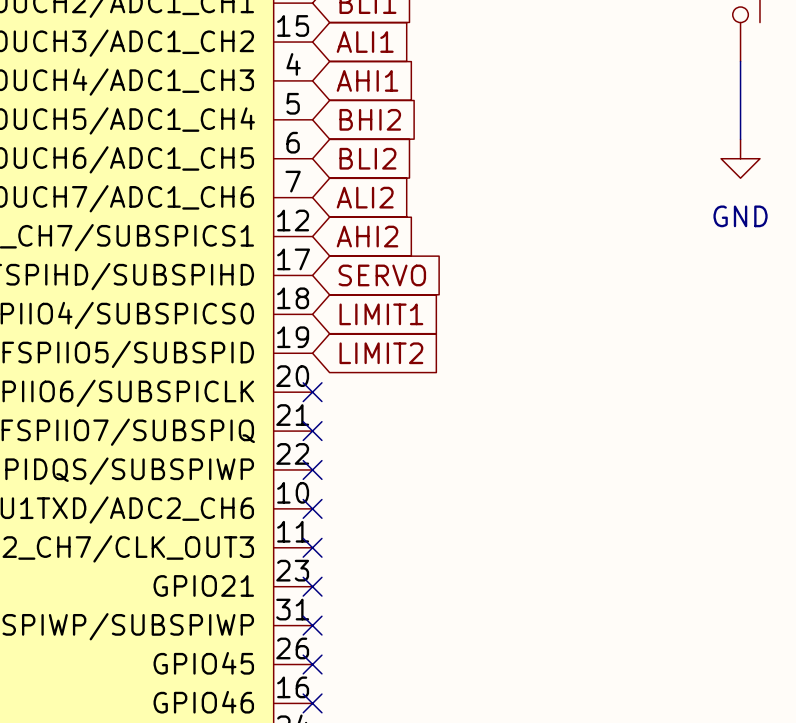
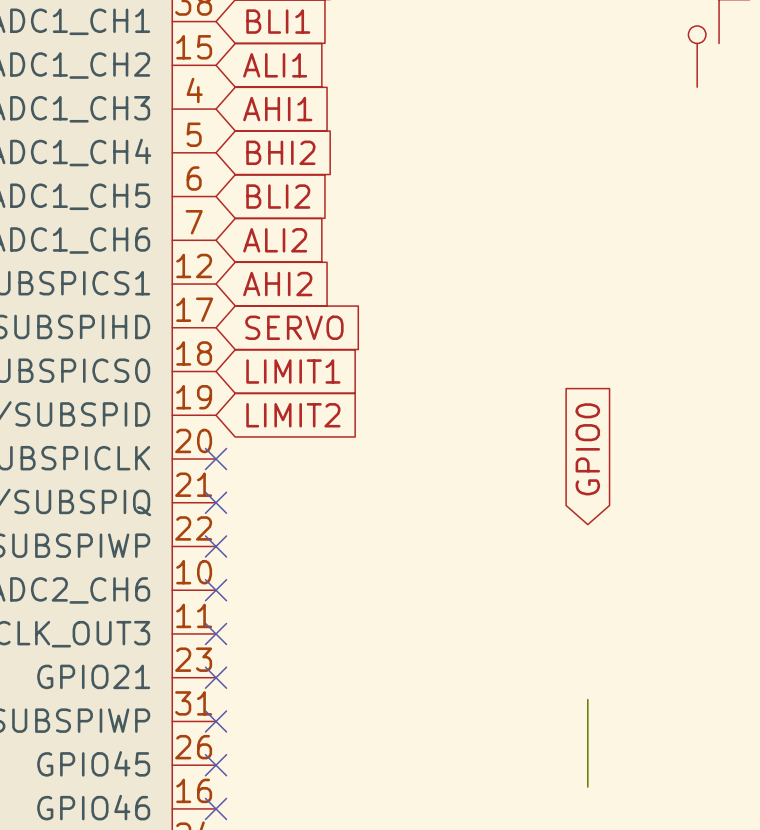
wire: (740, 61) (740, 139) -> none
power symbol: GND (740, 158) -> none
global label: none -> GPIO0 (587, 449)
wire: none -> (587, 699) (587, 787)

